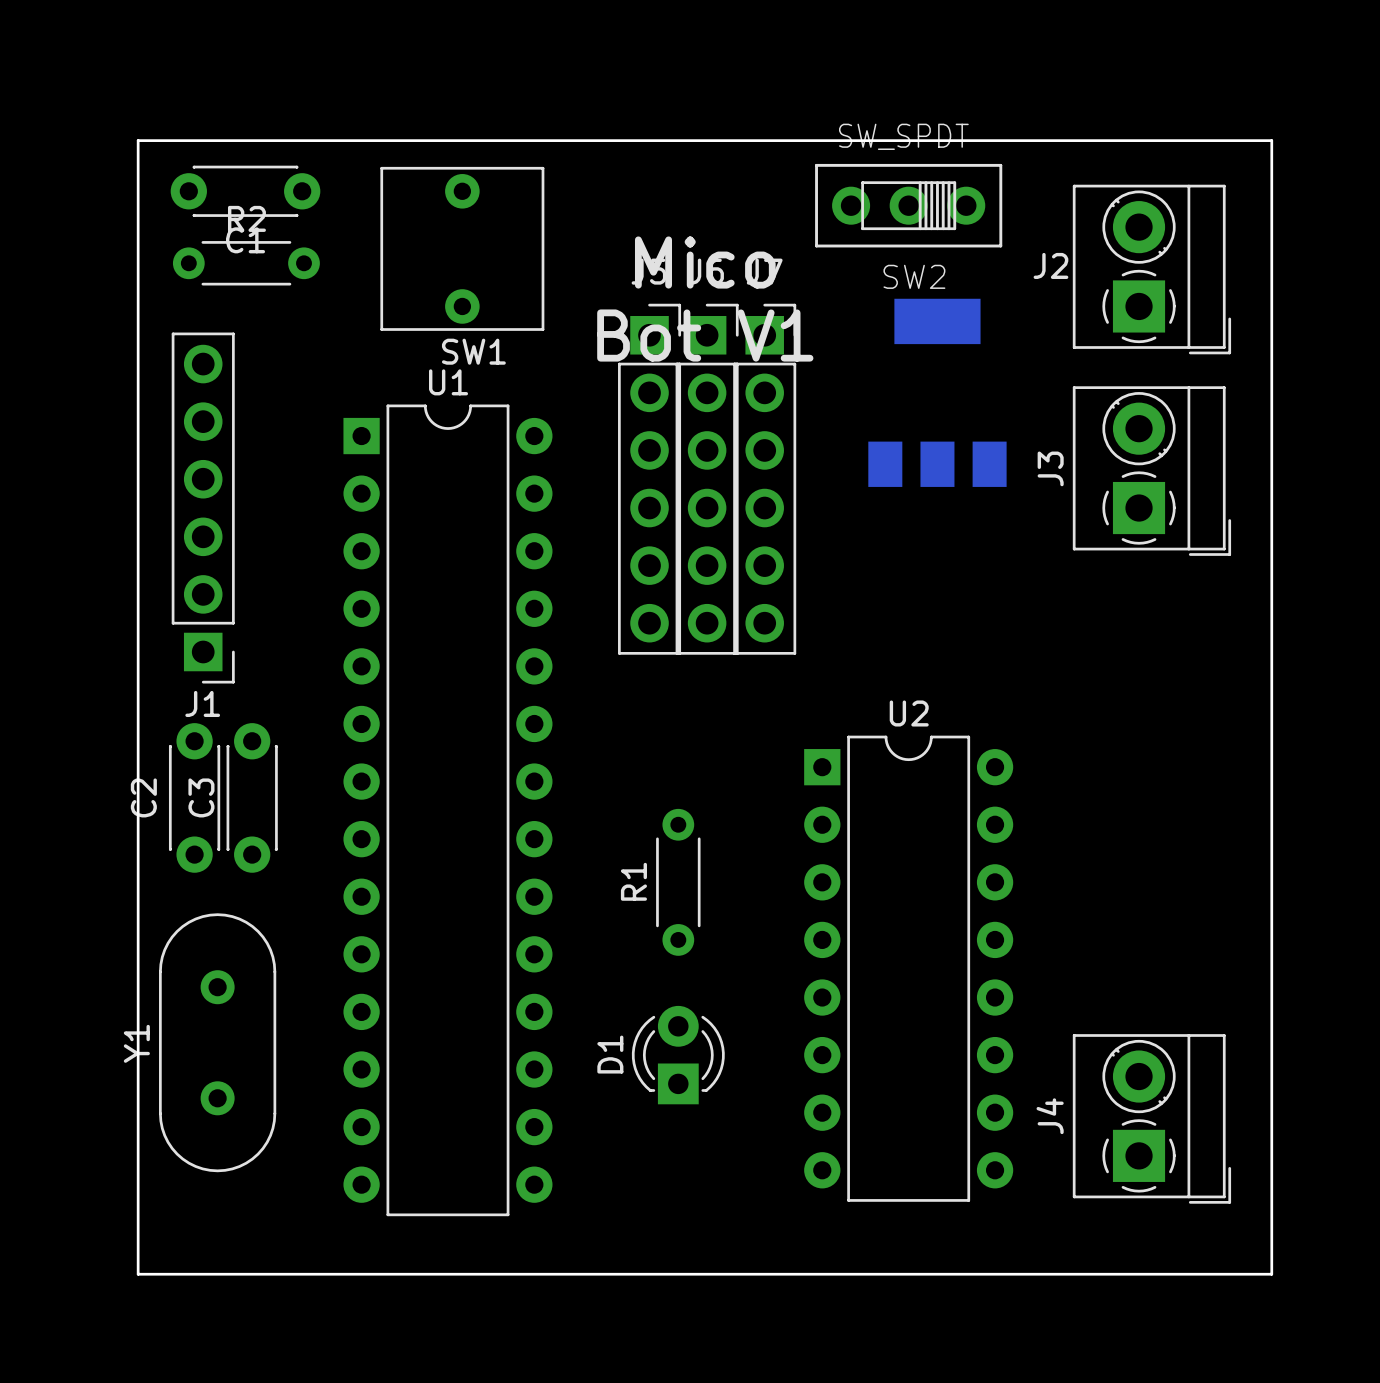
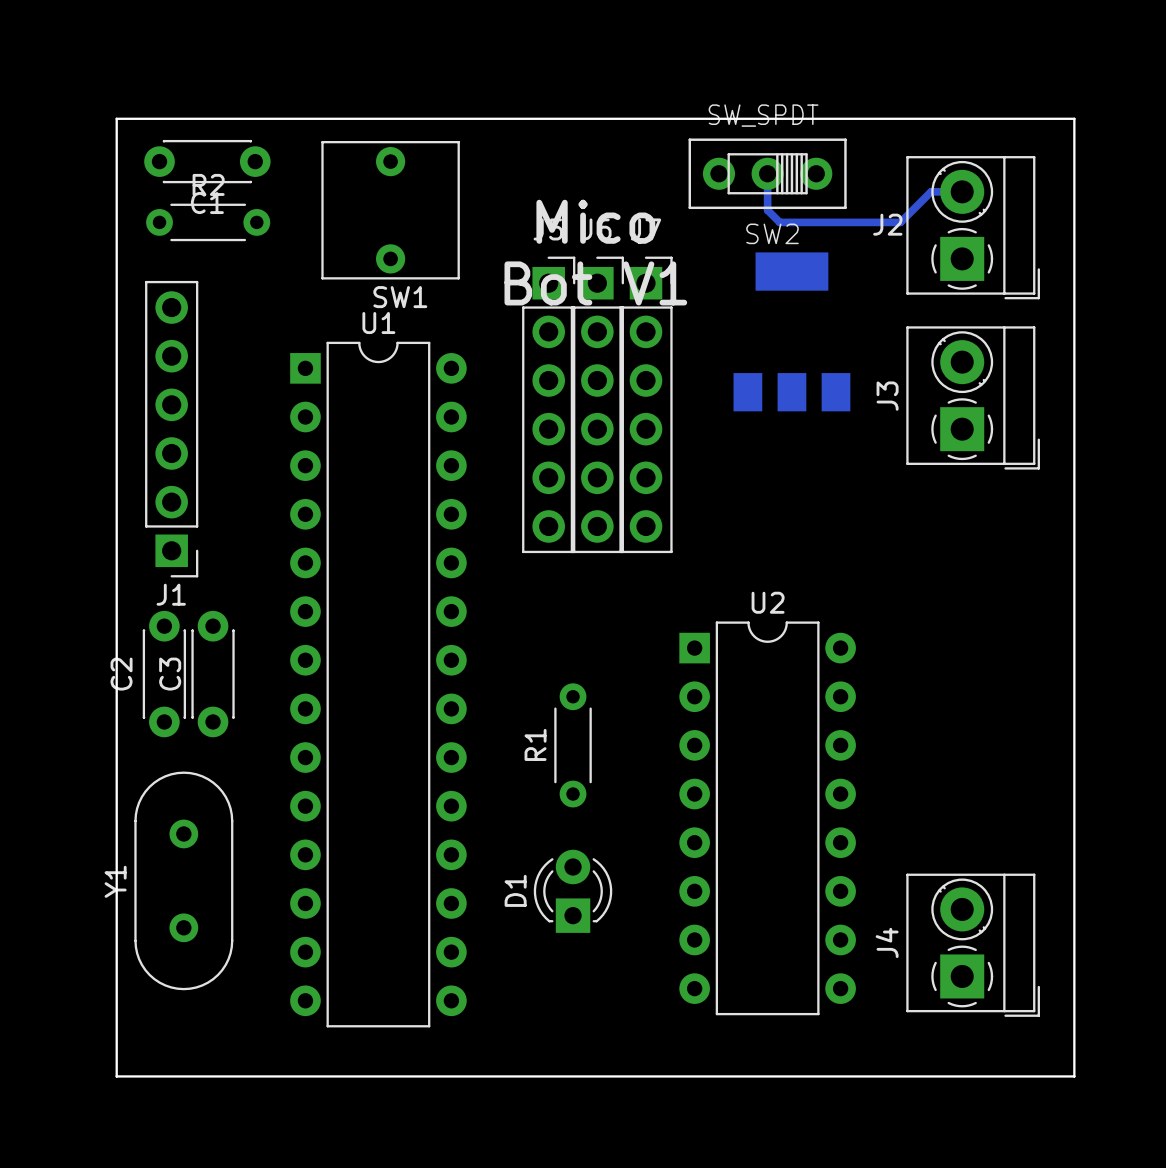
bottom track: none -> (767, 173) (767, 210) (779, 222) (900, 222) (931, 191) (962, 191)

